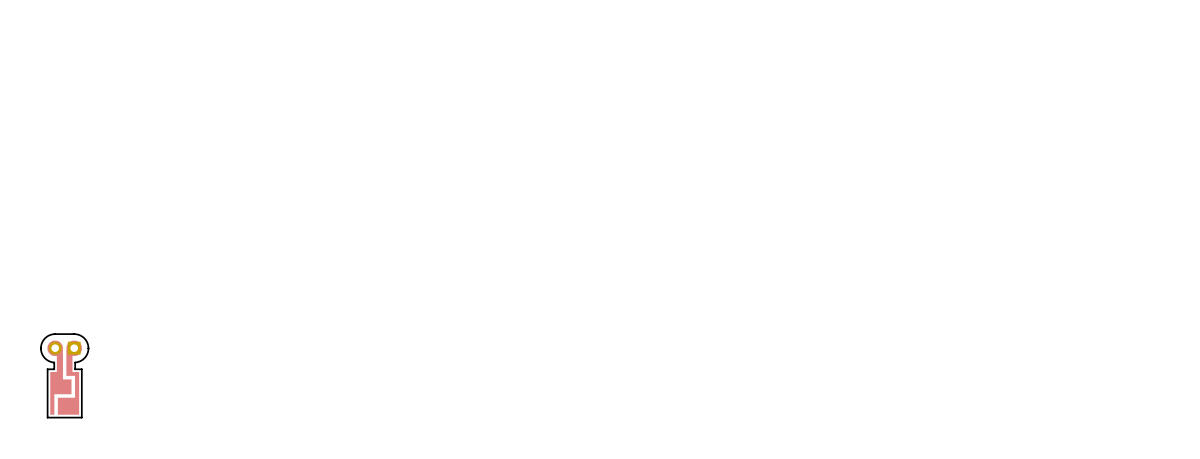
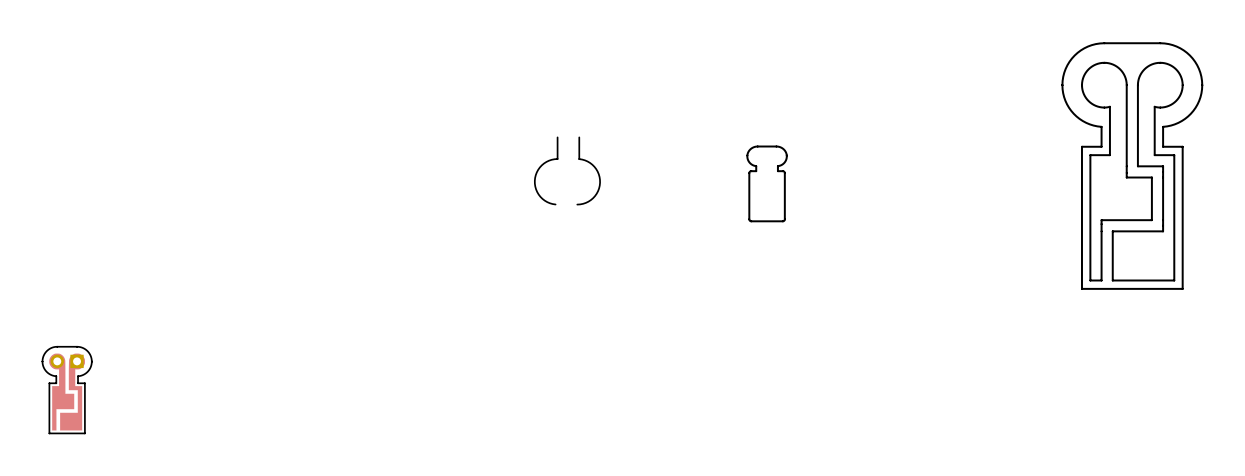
board edge: none -> (1104, 62) (1116, 66) (1125, 78) (1126, 177) (1151, 177) (1151, 220) (1101, 220) (1101, 280) (1090, 280) (1090, 155) (1109, 155) (1109, 106) (1099, 107) (1090, 102) (1083, 93) (1082, 82) (1084, 74) (1090, 67) (1104, 62)
board edge: none -> (1160, 62) (1146, 67) (1138, 80) (1137, 166) (1163, 166) (1163, 231) (1112, 231) (1112, 280) (1174, 280) (1174, 155) (1154, 155) (1154, 106) (1164, 107) (1174, 102) (1180, 93) (1182, 82) (1179, 74) (1174, 67) (1160, 62)
board edge: none -> (1202, 85) (1198, 68) (1189, 55) (1176, 46) (1160, 43) (1104, 43) (1088, 46) (1077, 52) (1069, 61) (1064, 72) (1062, 85)
board edge: none -> (1202, 85) (1199, 100) (1190, 113) (1178, 122) (1163, 126) (1163, 146) (1182, 146) (1182, 288) (1081, 288) (1081, 146) (1101, 146) (1101, 126) (1086, 122) (1073, 113) (1065, 100) (1062, 85)
board edge: none -> (557, 137) (557, 159) (549, 160) (541, 165) (536, 172) (534, 180) (536, 189) (540, 196) (547, 202) (555, 204)
board edge: none -> (579, 137) (579, 159) (587, 161) (594, 166) (598, 174) (600, 182) (598, 191) (593, 198) (585, 202) (577, 204)
board edge: none -> (776, 146) (783, 149) (786, 155) (784, 162) (777, 166) (777, 171) (784, 172) (784, 219) (750, 221) (749, 172) (756, 171) (756, 166) (749, 161) (747, 153) (754, 146) (776, 146)

